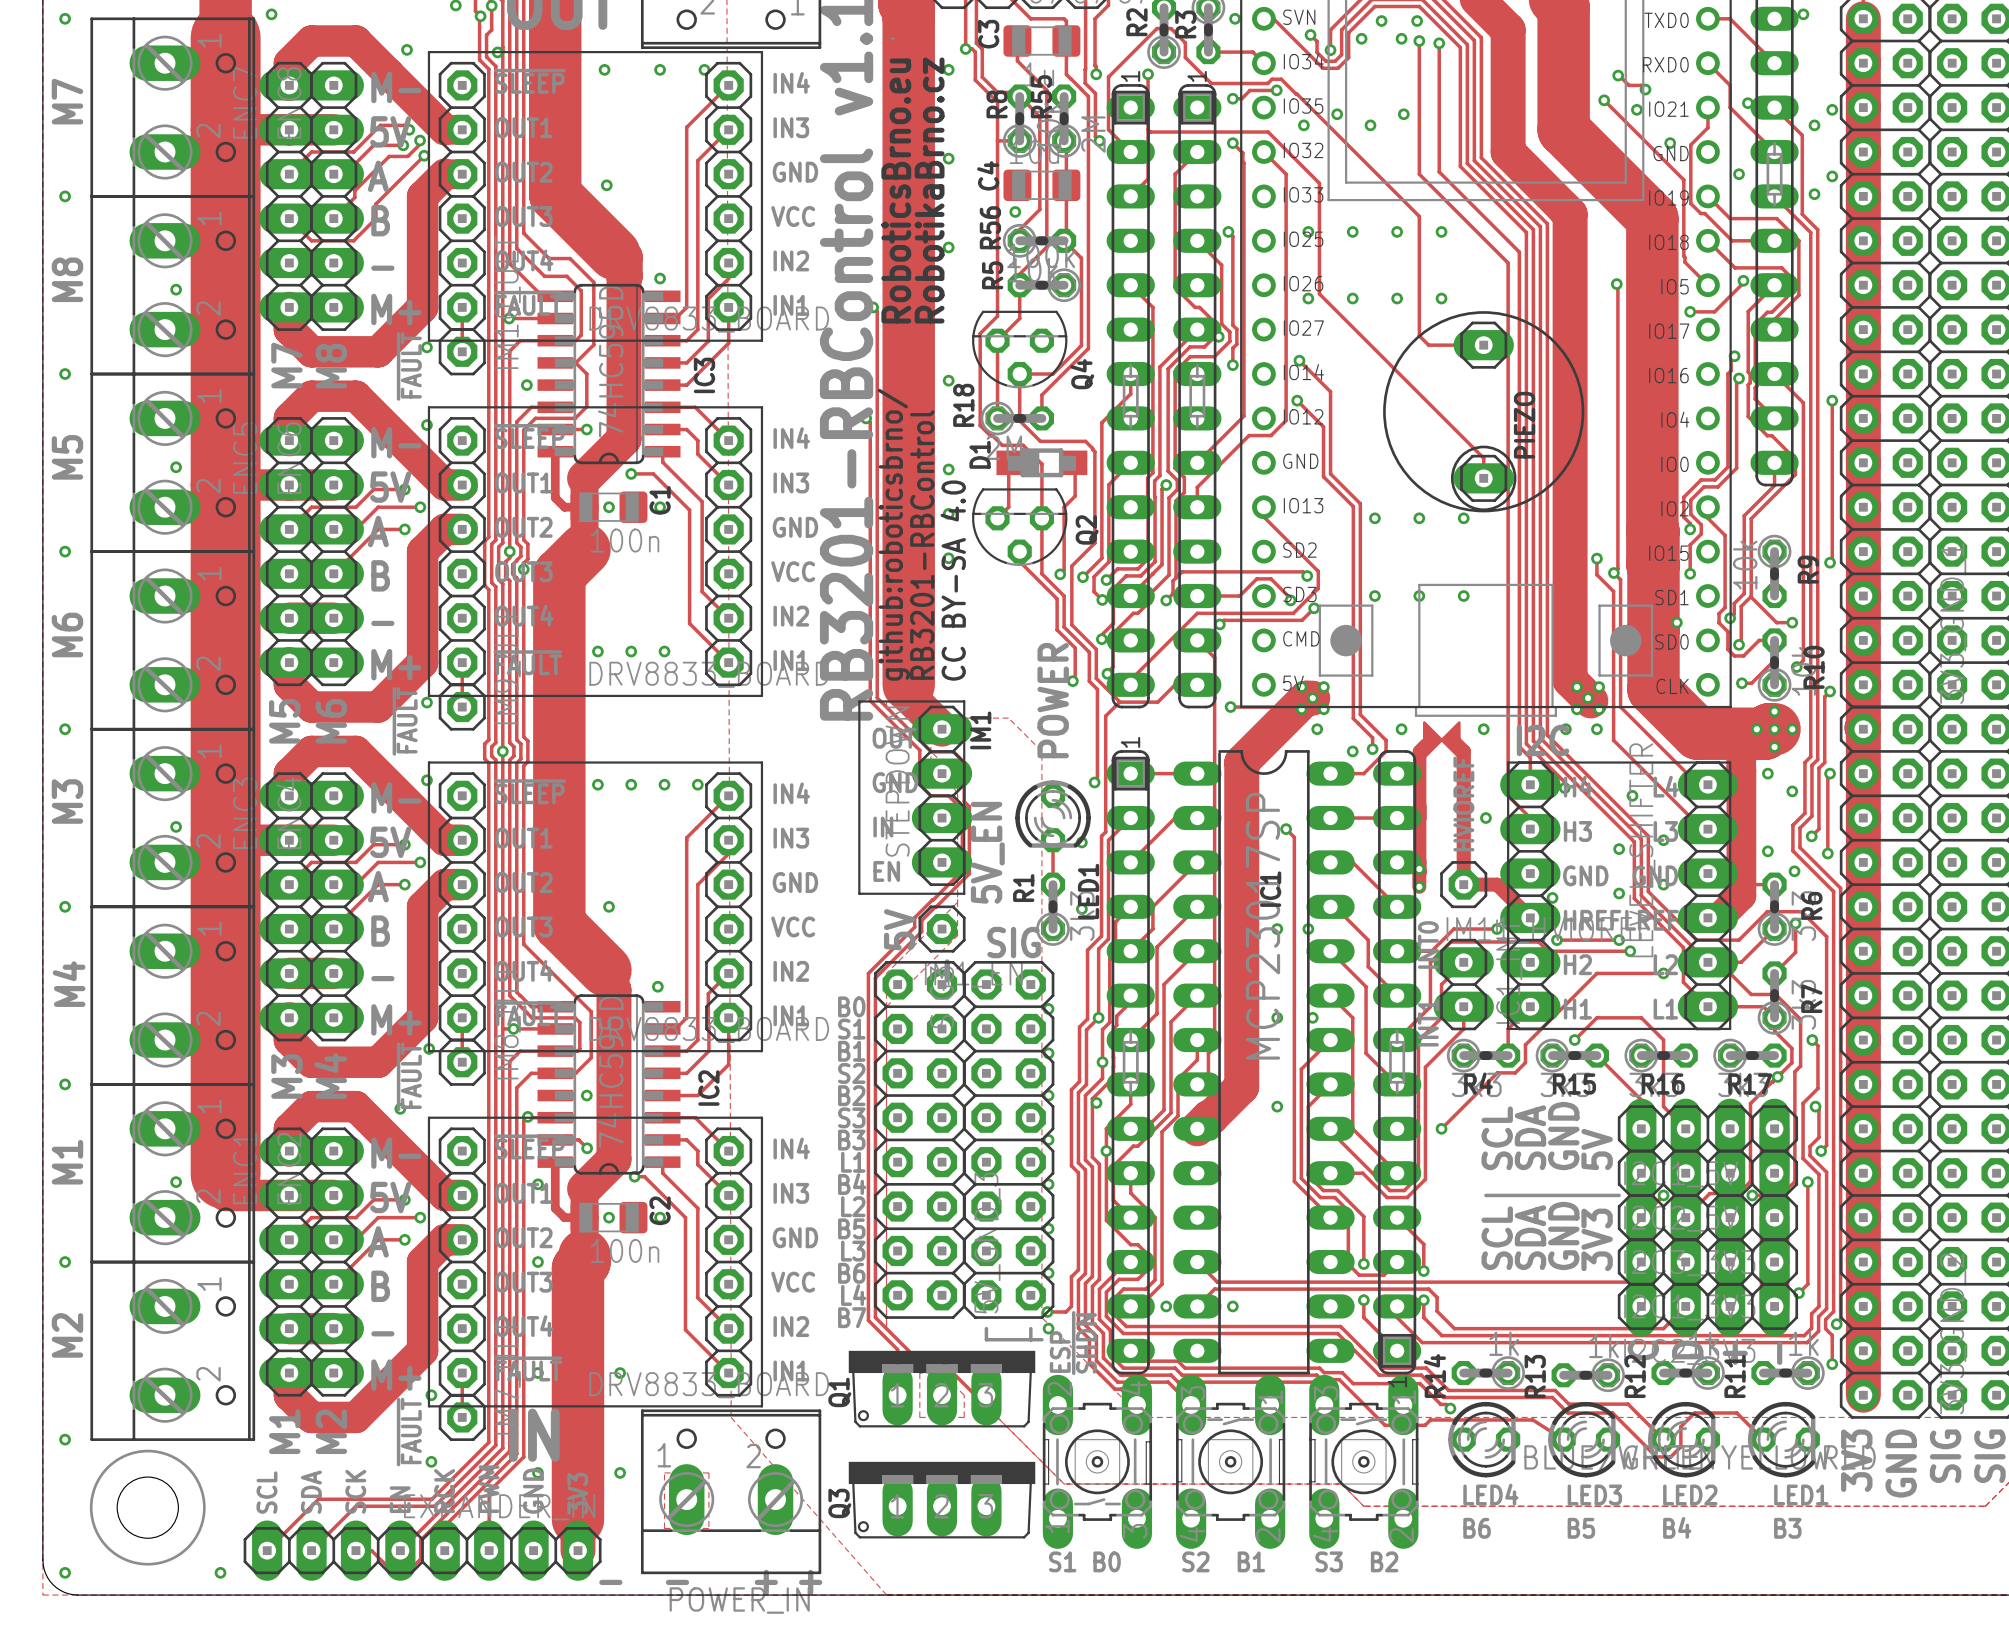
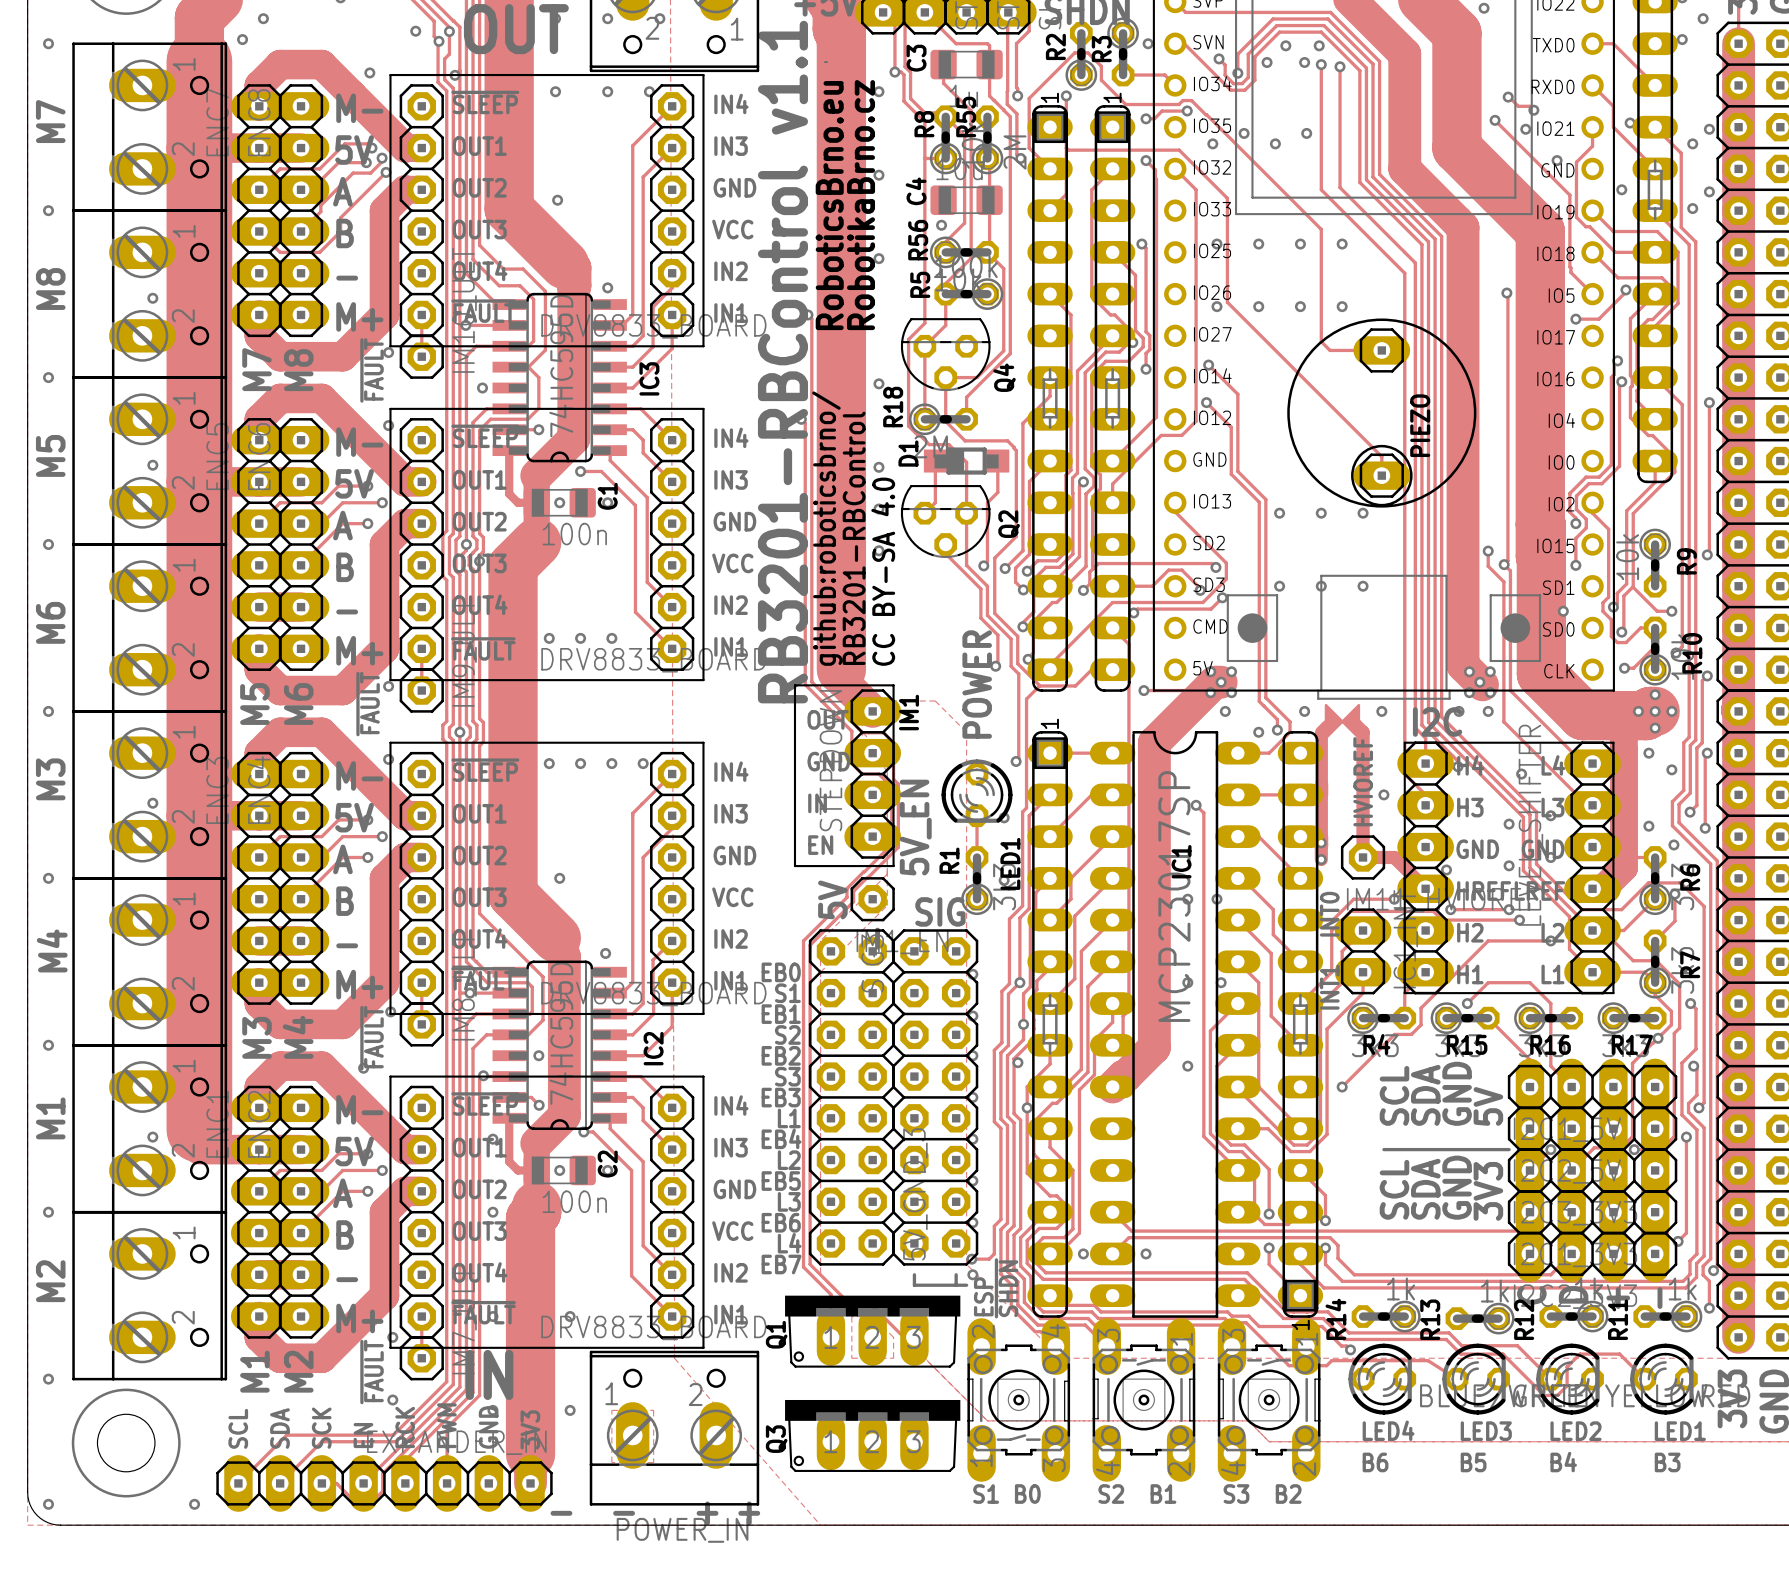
text: B0 (851, 1006) -> EB0 (781, 972)
text: B1 (851, 1051) -> EB1 (781, 1014)
text: B2 (851, 1095) -> EB2 (781, 1055)
text: B3 (851, 1140) -> EB3 (781, 1097)
text: B4 (852, 1184) -> EB4 (781, 1138)
text: B5 (851, 1228) -> EB5 (781, 1181)
text: B6 (851, 1273) -> EB6 (781, 1222)
text: B7 (852, 1317) -> EB7 (781, 1264)

